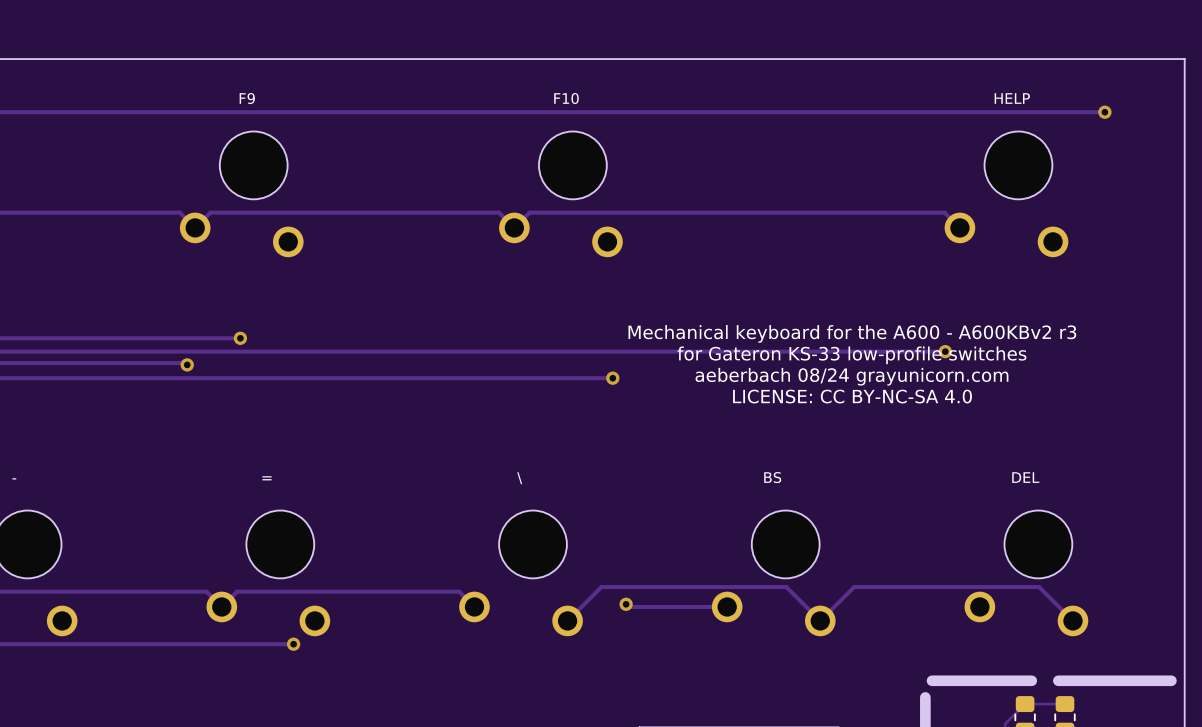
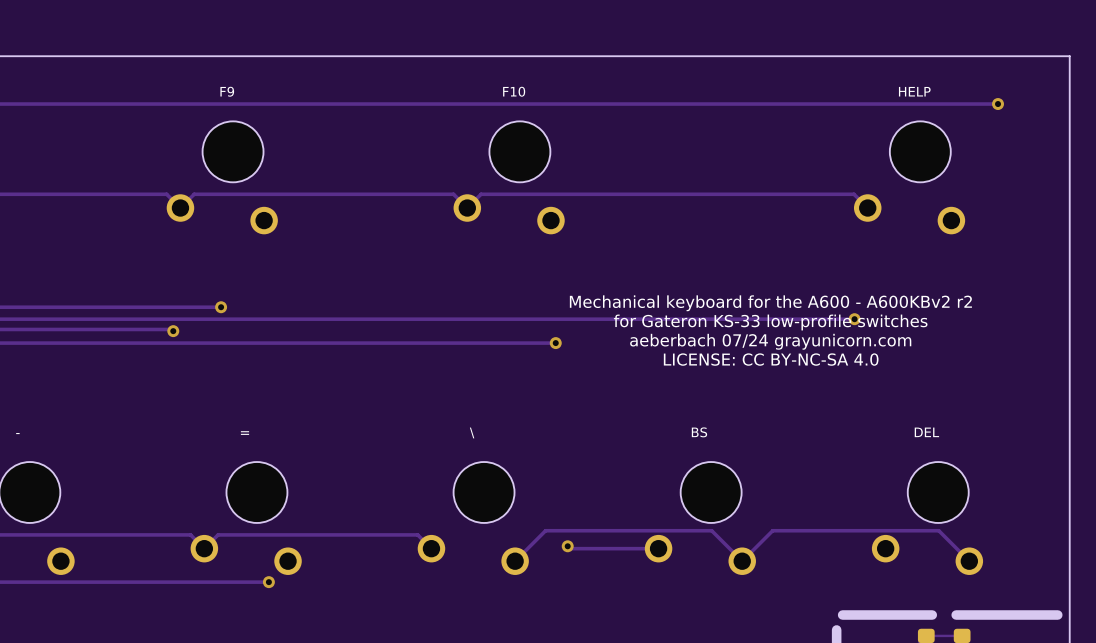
text: Mechanical keyboard for the A600 - A600KBv2 r3 (852, 333) -> Mechanical keyboard for the A600 - A600KBv2 r2 (770, 303)
text: aeberbach 08/24 grayunicorn.com (851, 376) -> aeberbach 07/24 grayunicorn.com (770, 341)

